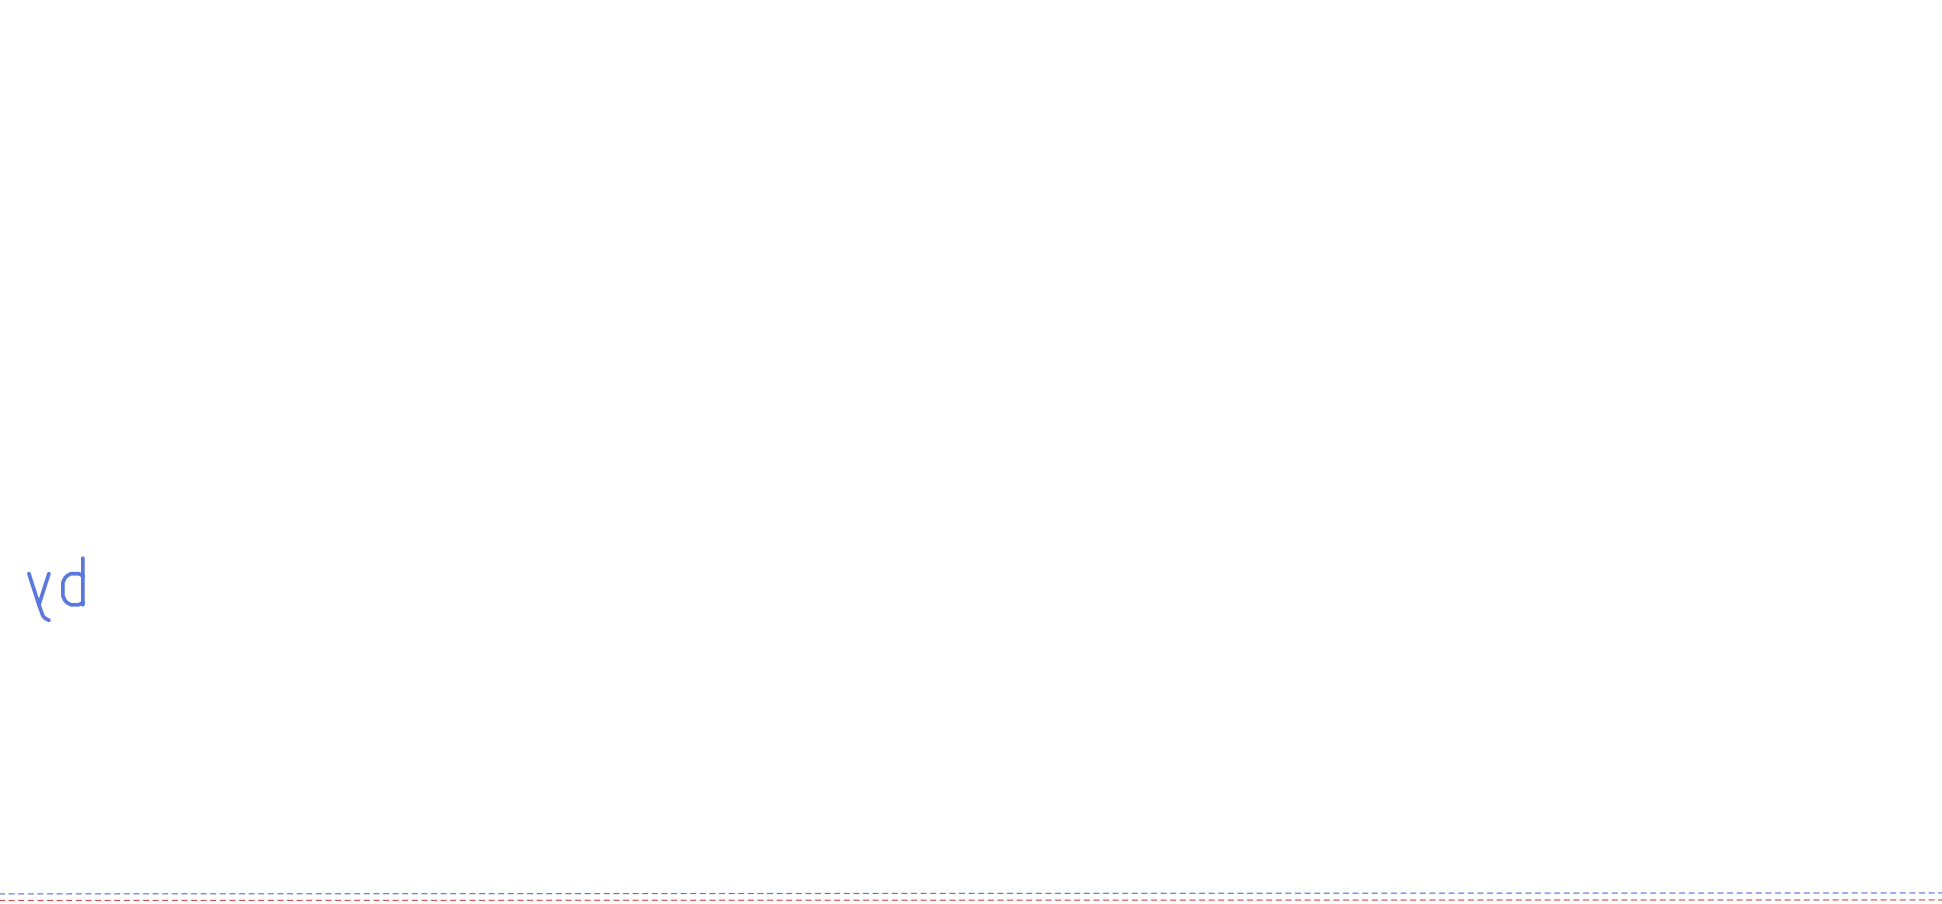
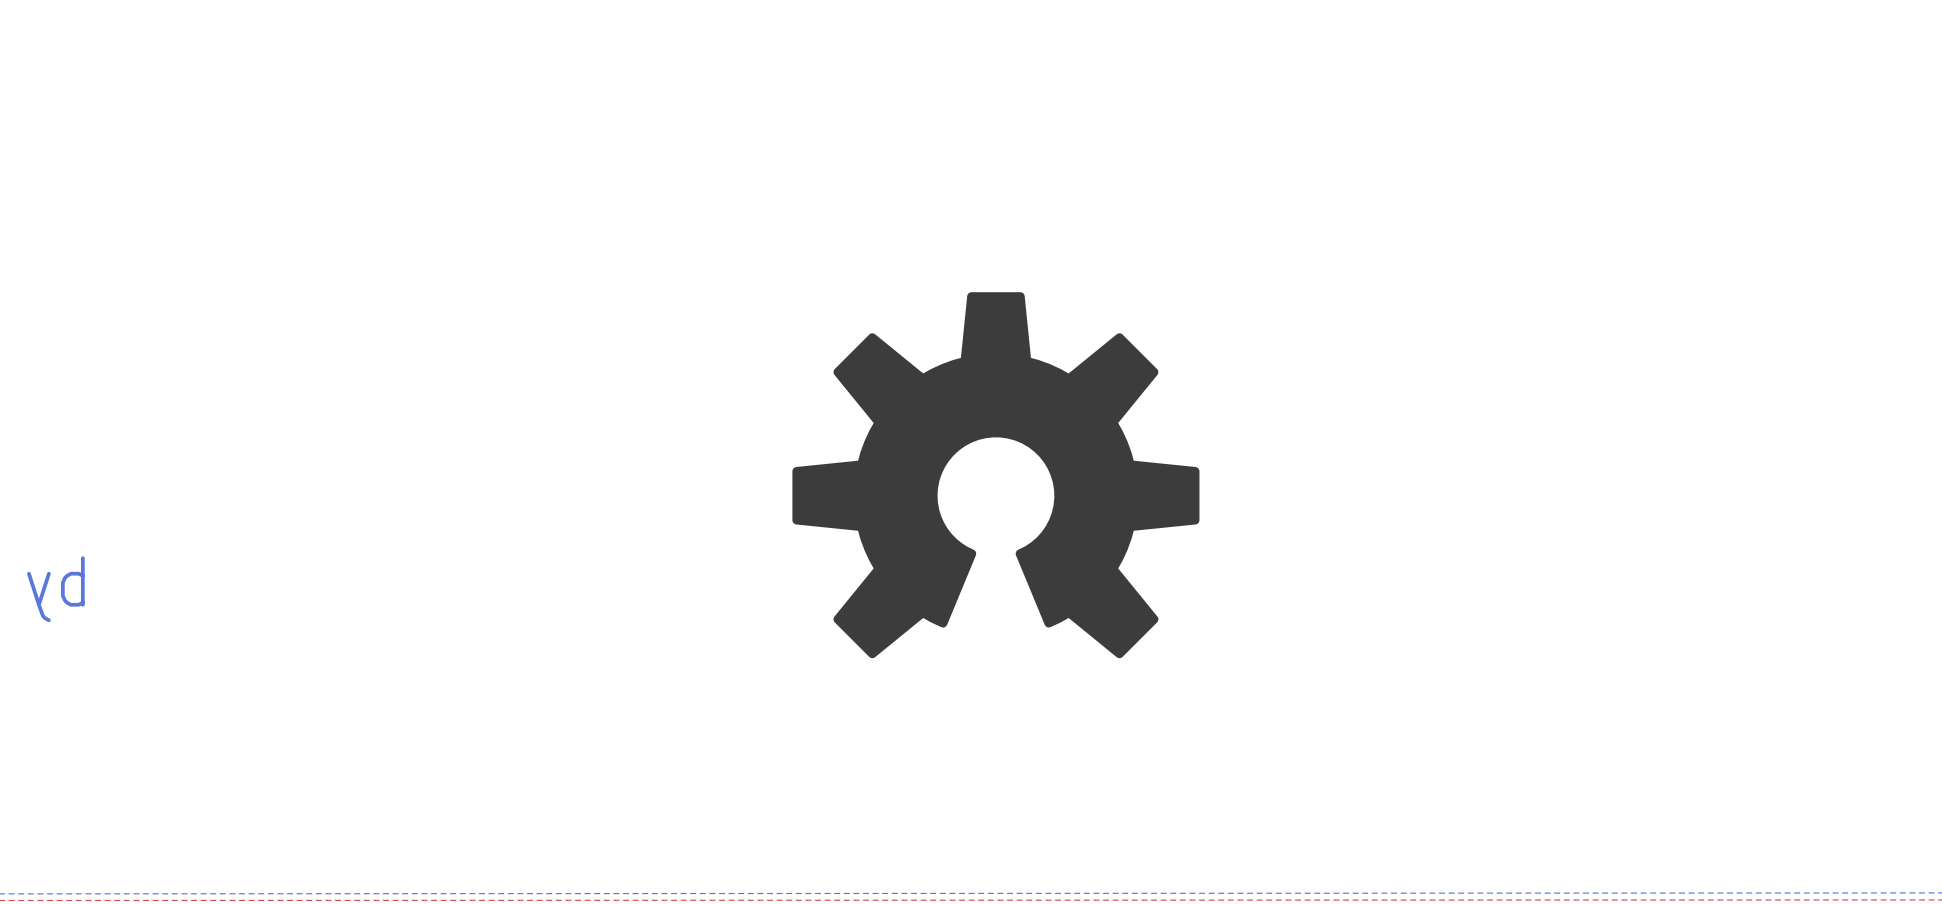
drawing: none -> [792, 292, 1200, 659]

